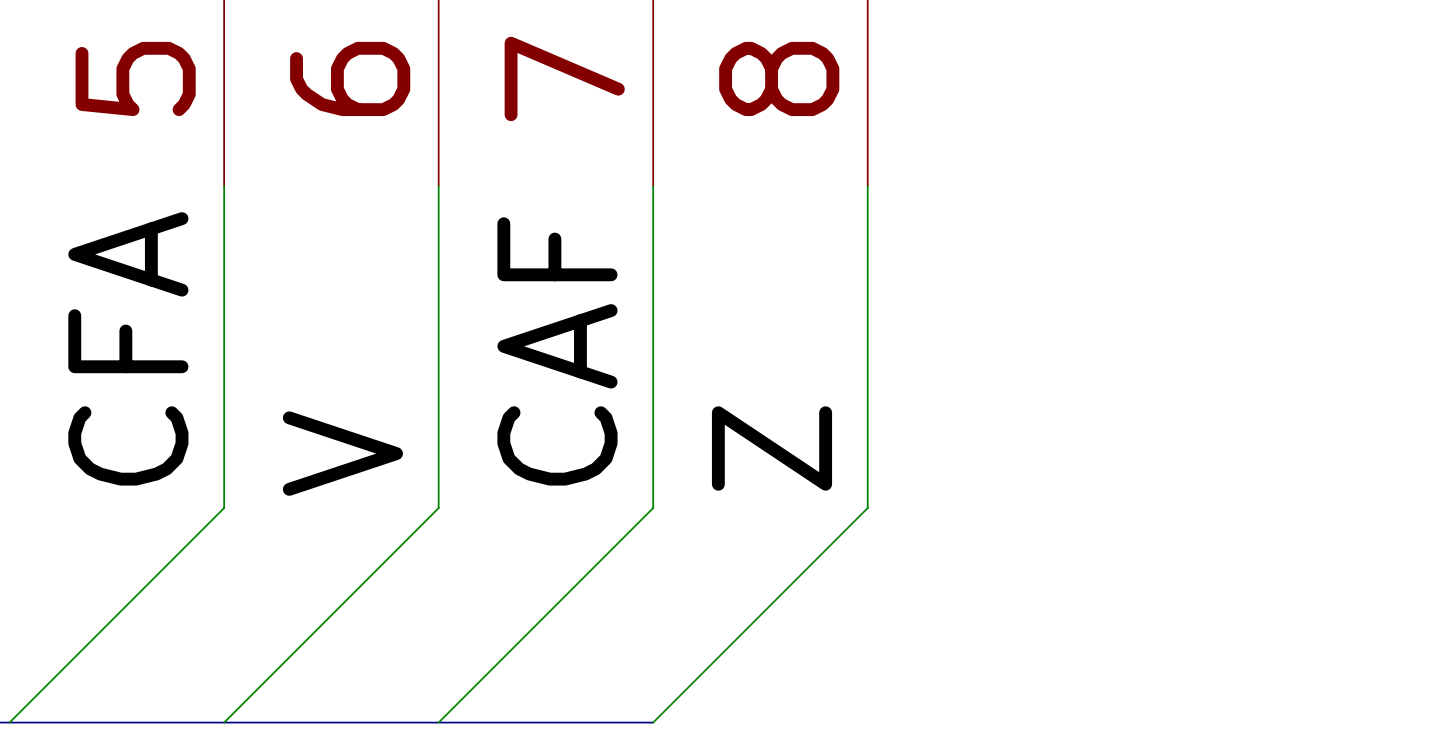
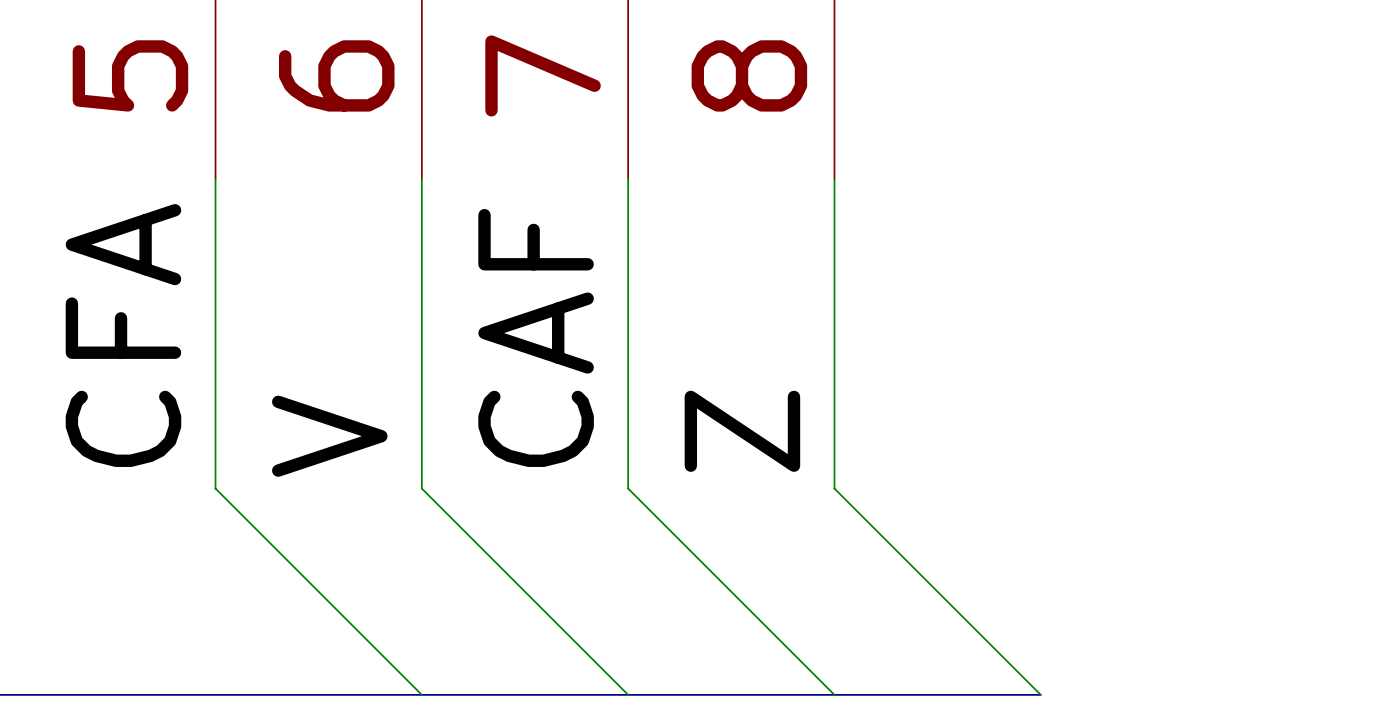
wire: (224, 508) (9, 722) -> (215, 488) (421, 694)
wire: (438, 508) (224, 722) -> (421, 488) (628, 694)
wire: (653, 508) (438, 722) -> (628, 488) (834, 694)
wire: (867, 508) (653, 722) -> (834, 488) (1040, 694)
bus: none -> (628, 694) (1040, 694)

